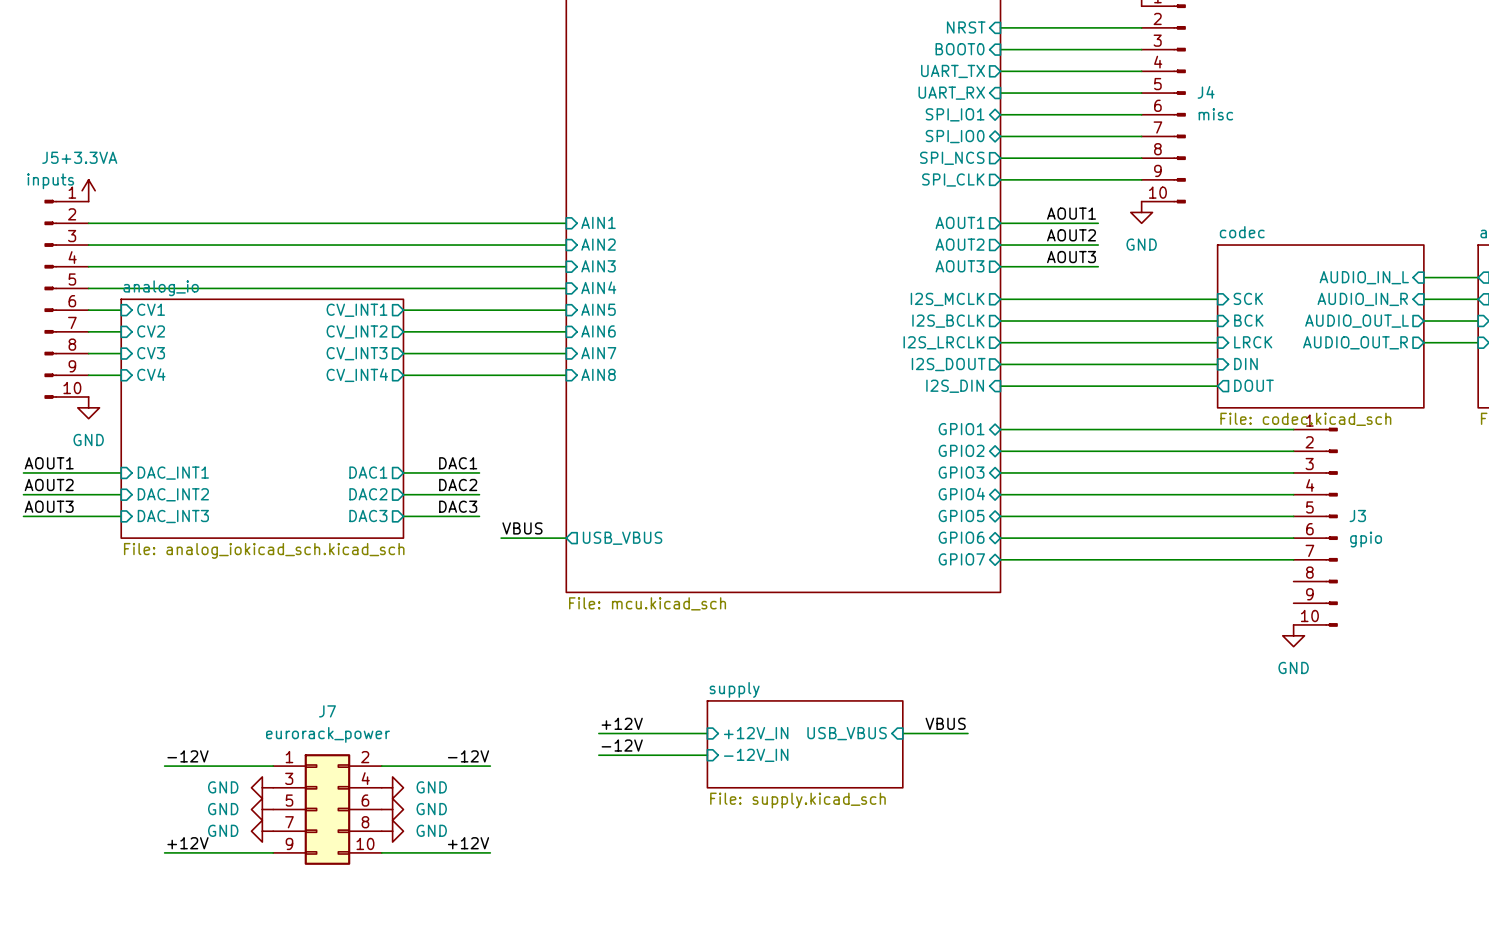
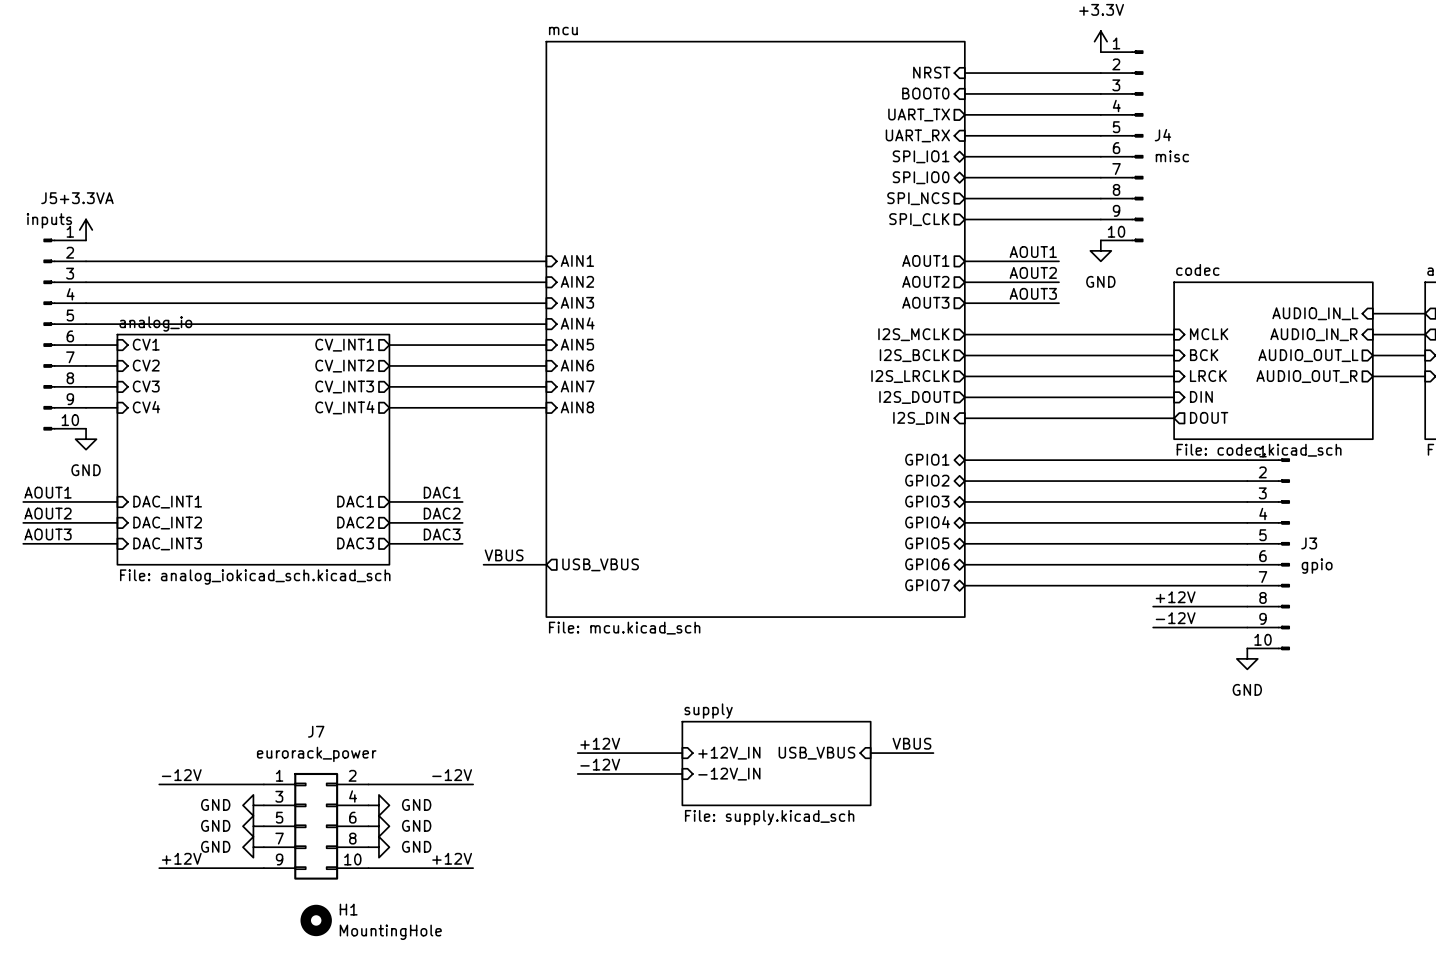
sheet pin: SCK (1248, 298) -> MCLK (1209, 334)
label: none -> +12V (1175, 597)
wire: none -> (1153, 606) (1247, 606)
label: none -> -12V (1175, 618)
wire: none -> (1153, 627) (1247, 627)
H1: none -> MountingHole (316, 920)

